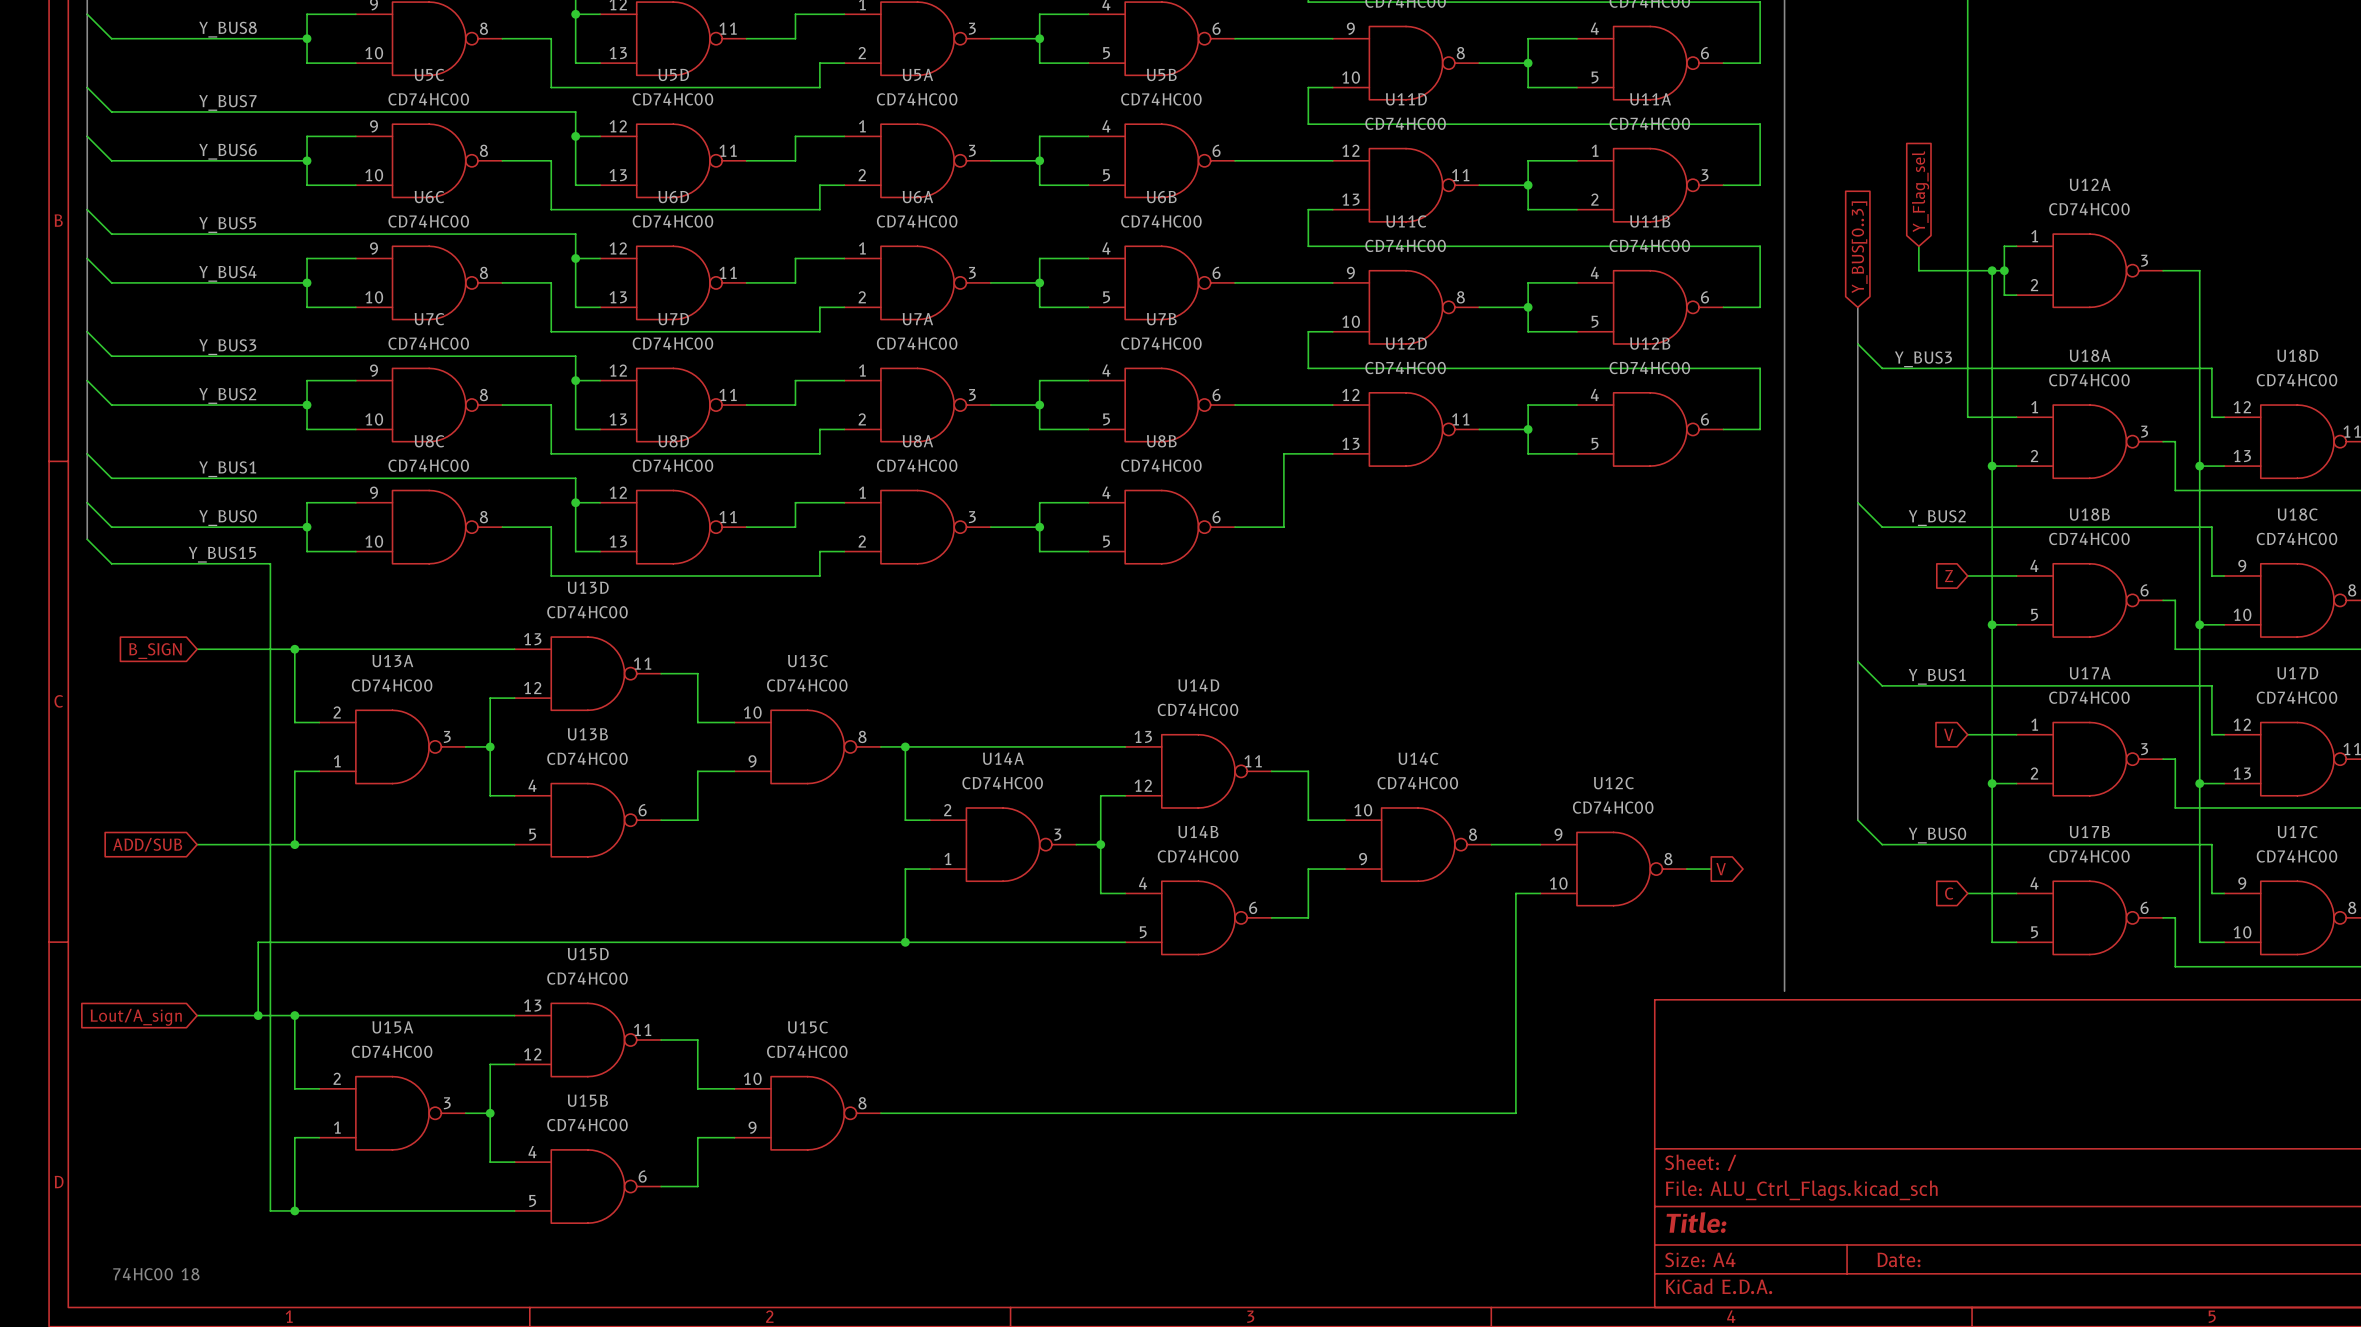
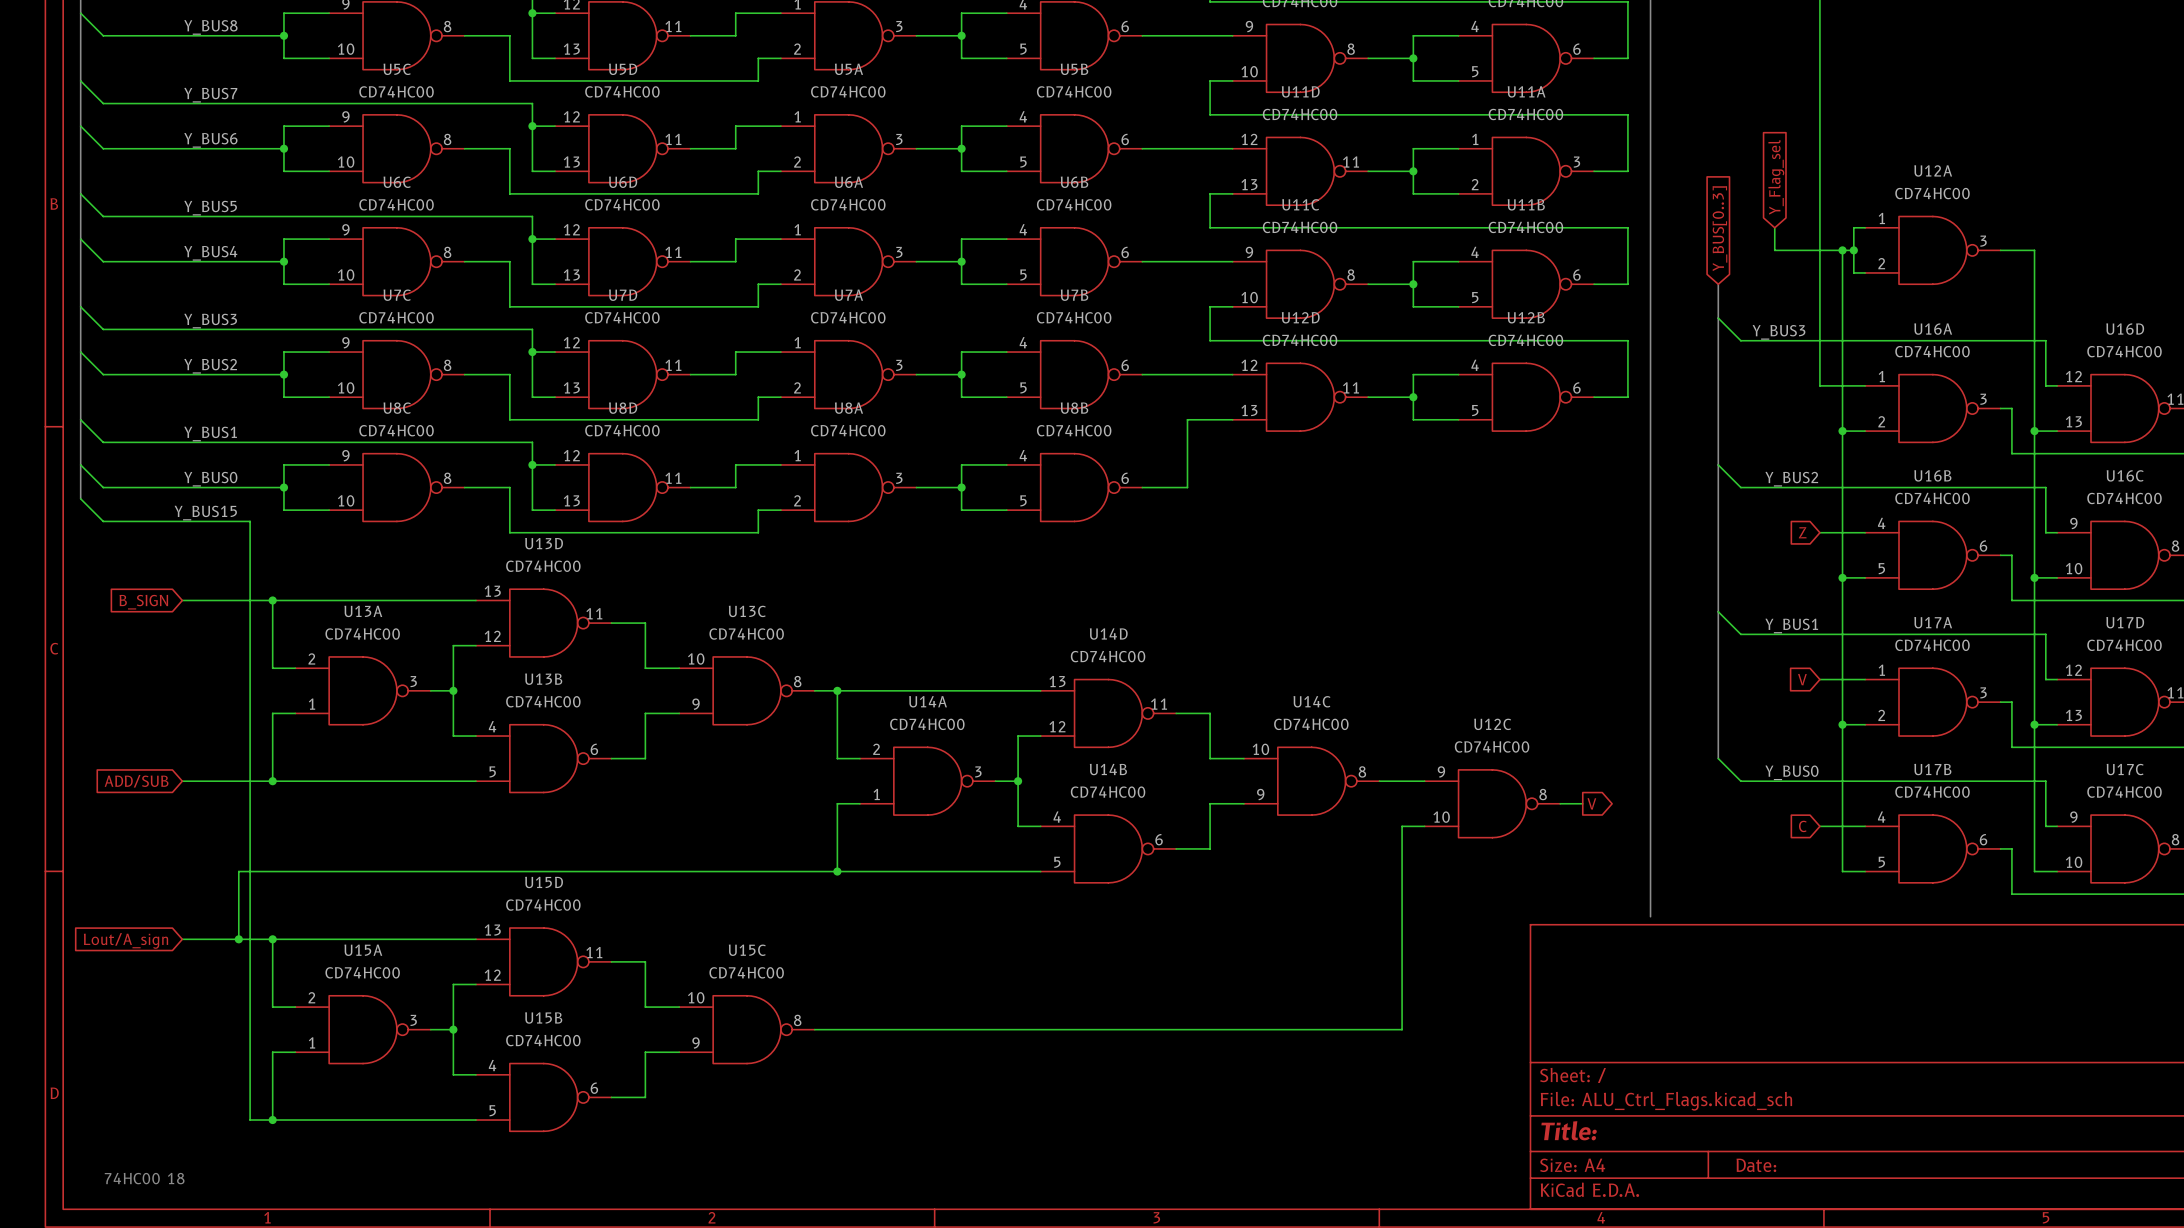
U18A name: U18A (2090, 355) -> U16A (1933, 329)
U18D name: U18D (2297, 355) -> U16D (2125, 329)
U18B name: U18B (2089, 514) -> U16B (1932, 475)
U18C name: U18C (2297, 514) -> U16C (2125, 475)

